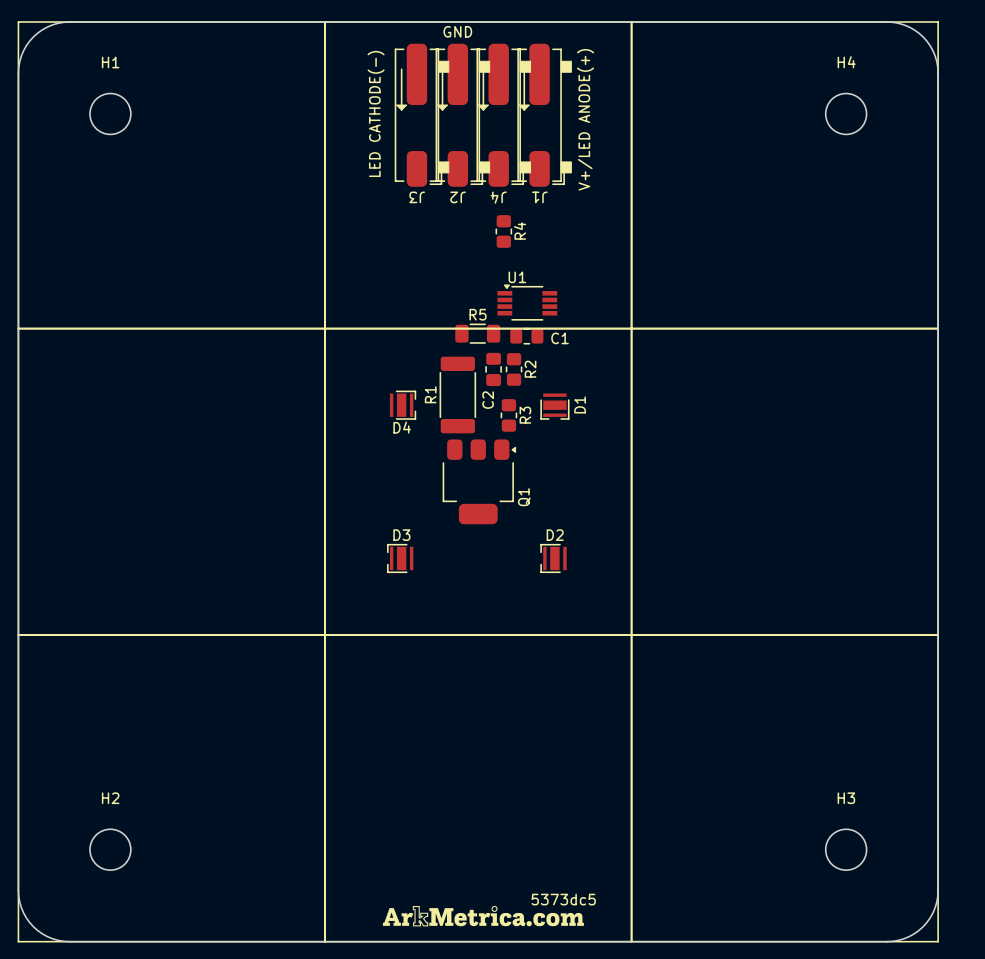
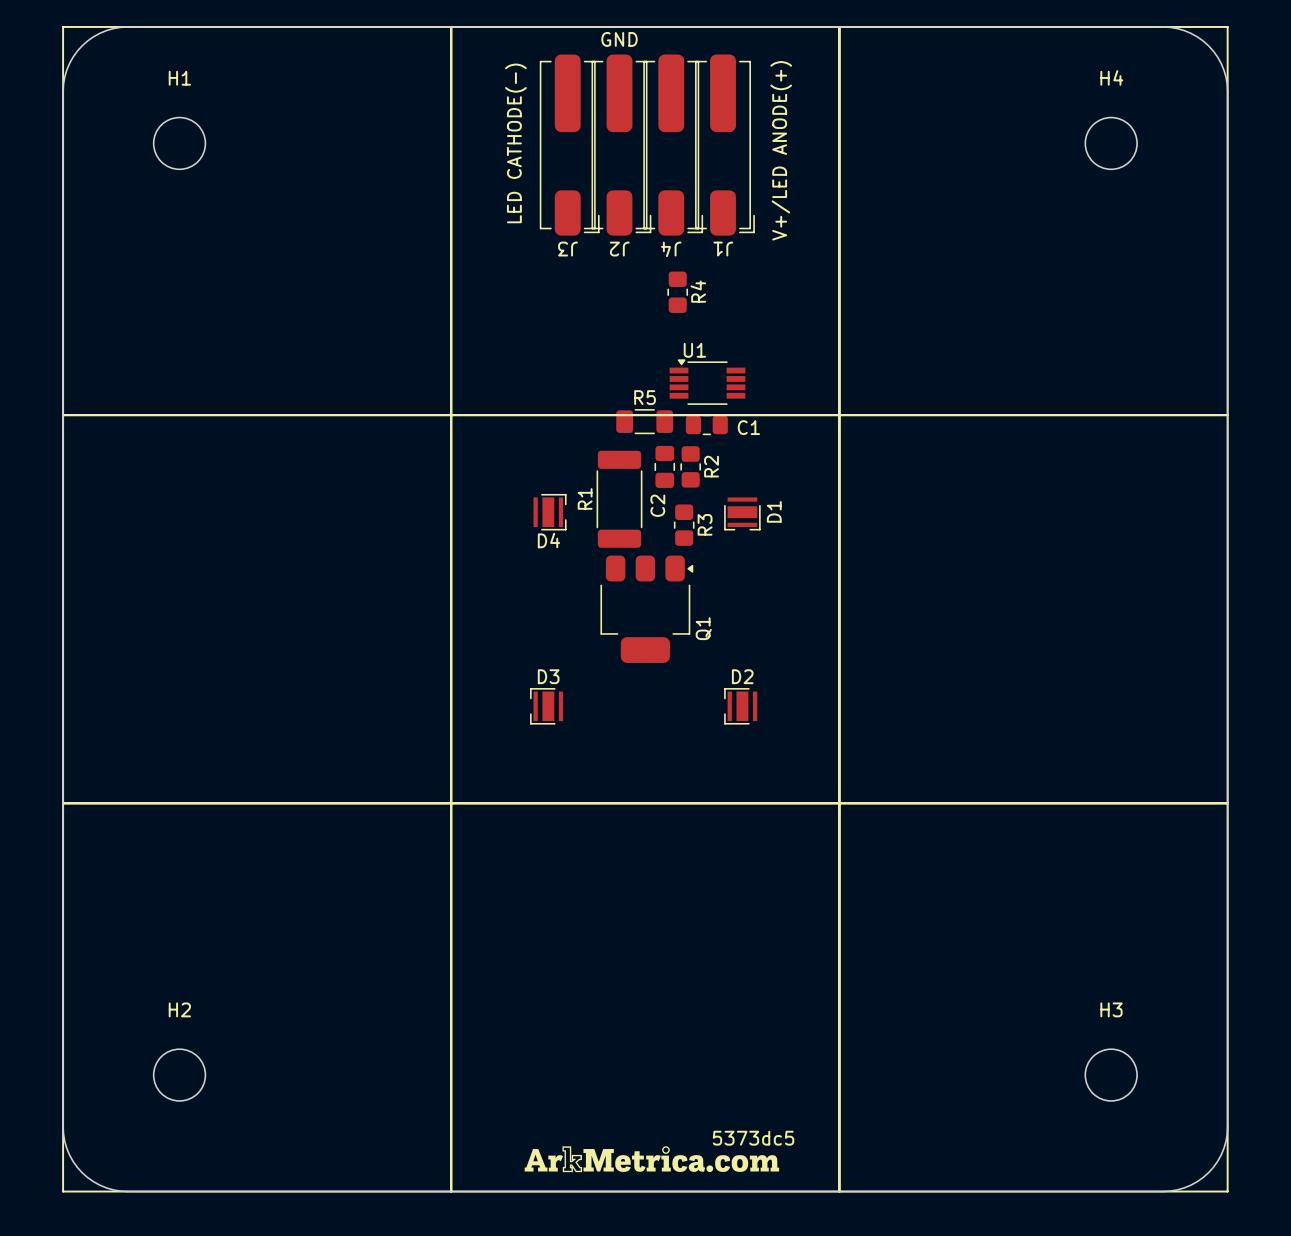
J3 footprint: [394, 43, 450, 187] -> [539, 54, 600, 236]
J2 footprint: [435, 43, 491, 187] -> [591, 54, 652, 236]
J4 footprint: [476, 43, 532, 187] -> [643, 54, 704, 236]
J1 footprint: [517, 43, 572, 187] -> [695, 54, 755, 236]

